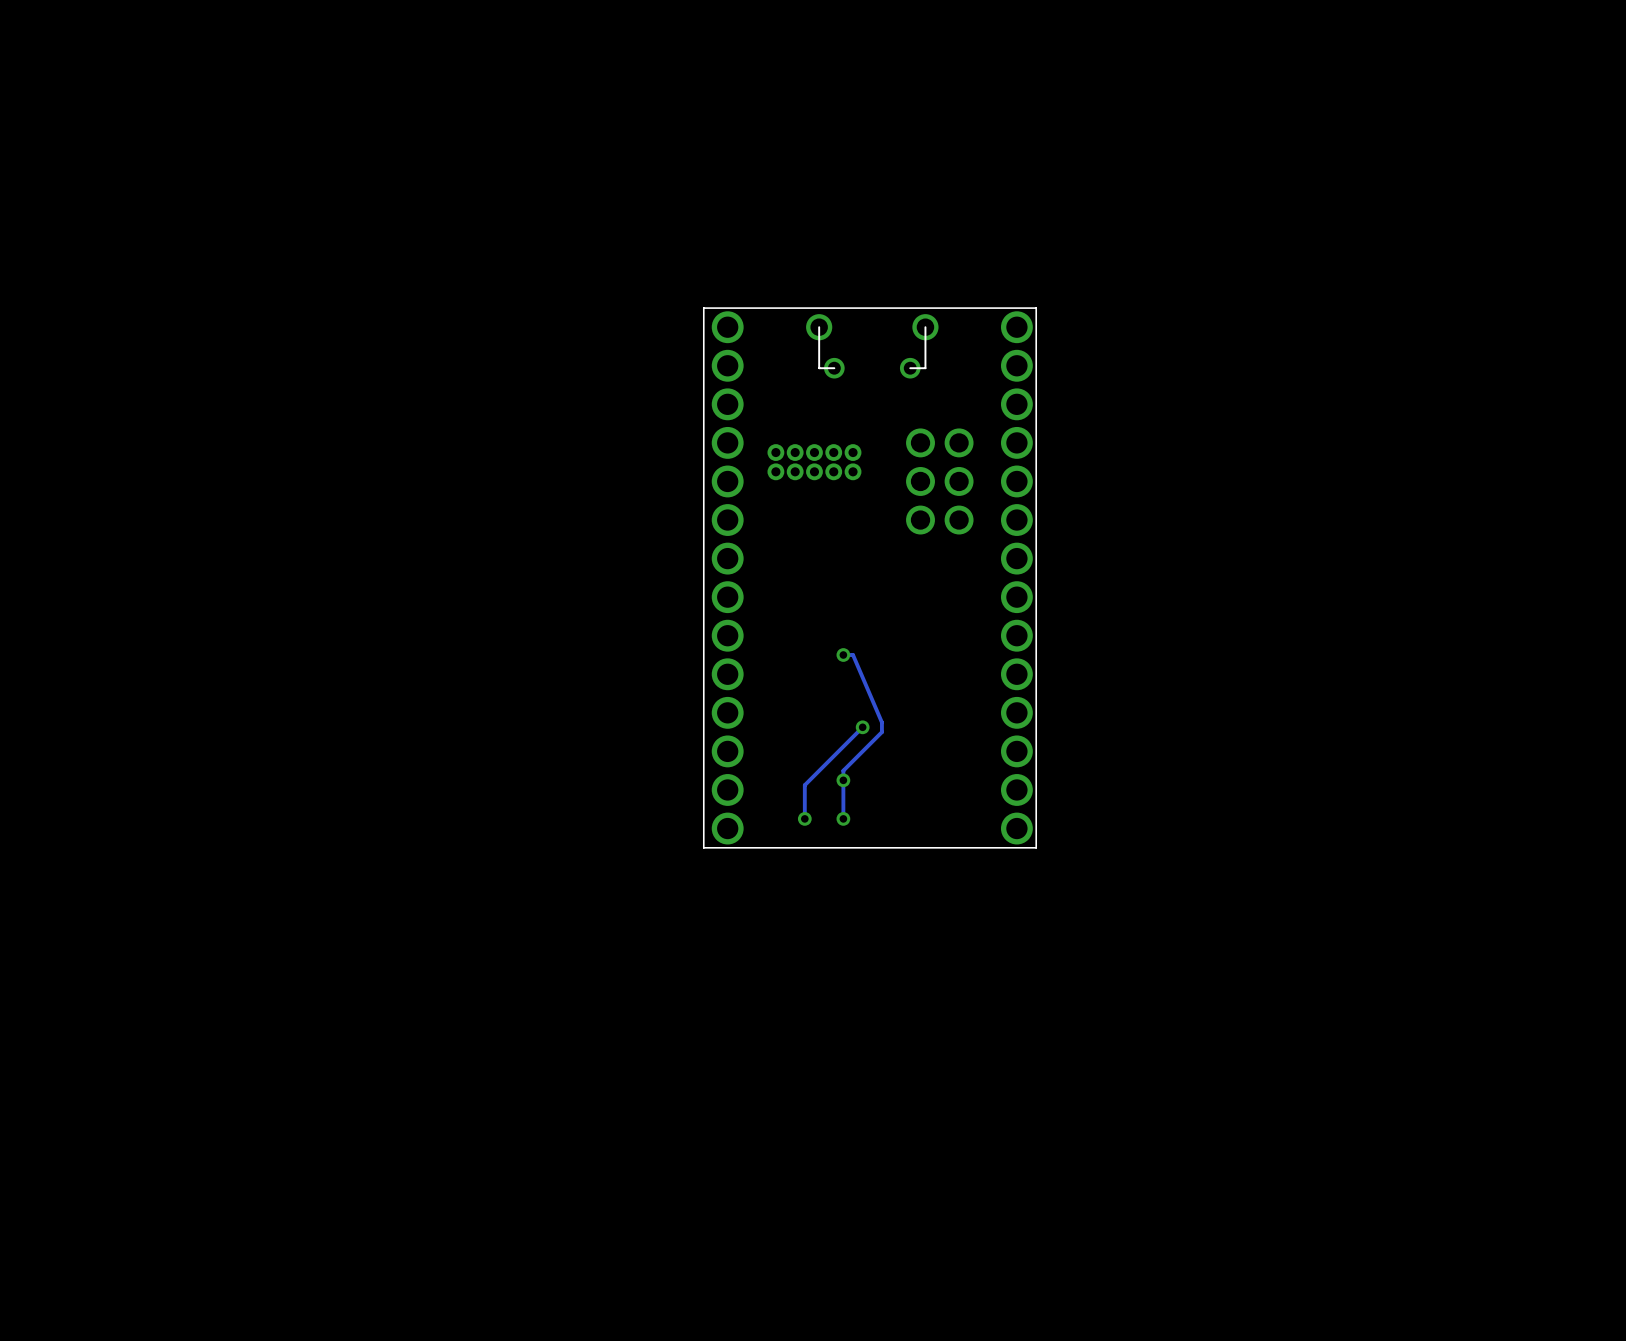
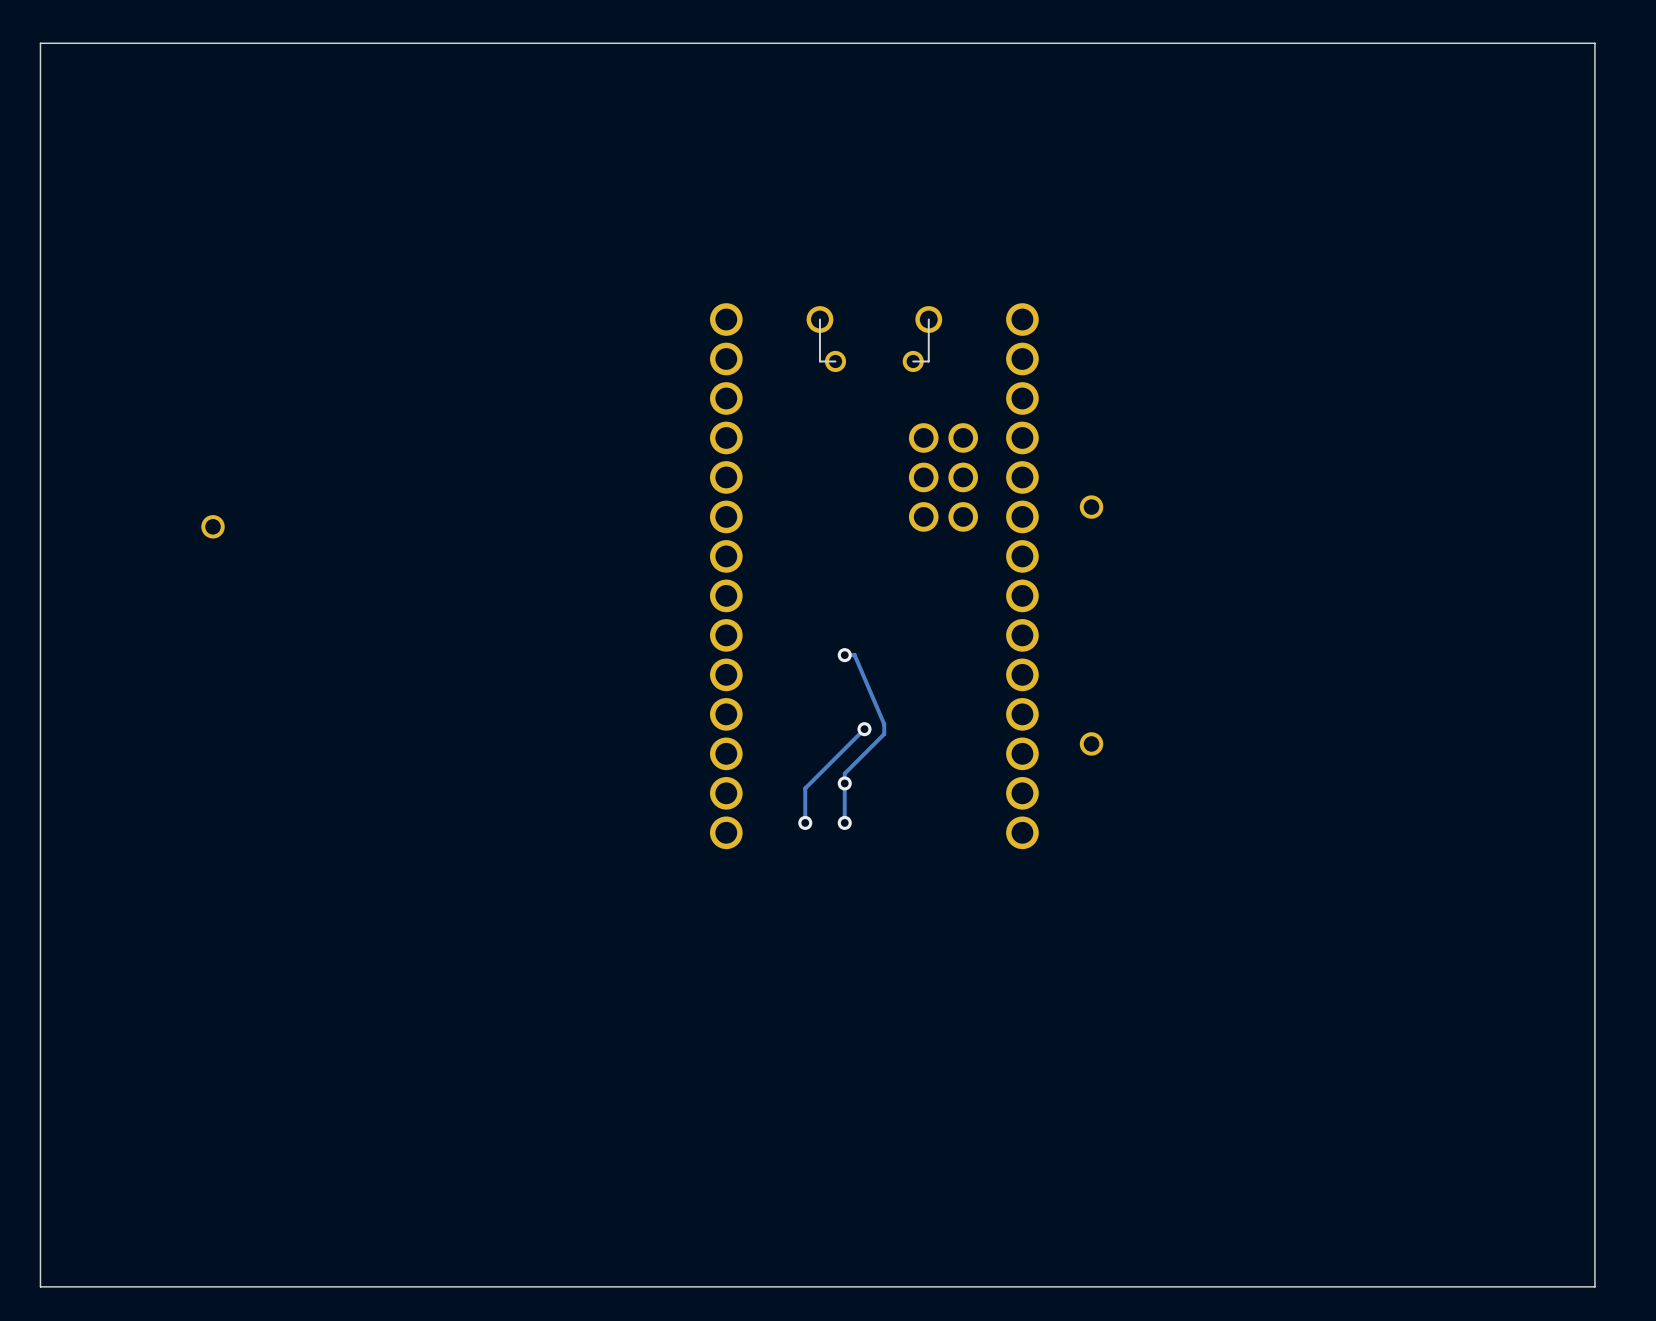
board edge: none -> (1594, 43) (40, 43) (40, 1286) (1594, 1286) (1594, 43)
board edge: (1036, 308) (703, 308) (703, 847) (1036, 847) (1036, 308) -> none
part: (814, 462) -> none
part: none -> (1091, 507)
part: none -> (213, 526)
part: none -> (1091, 743)

